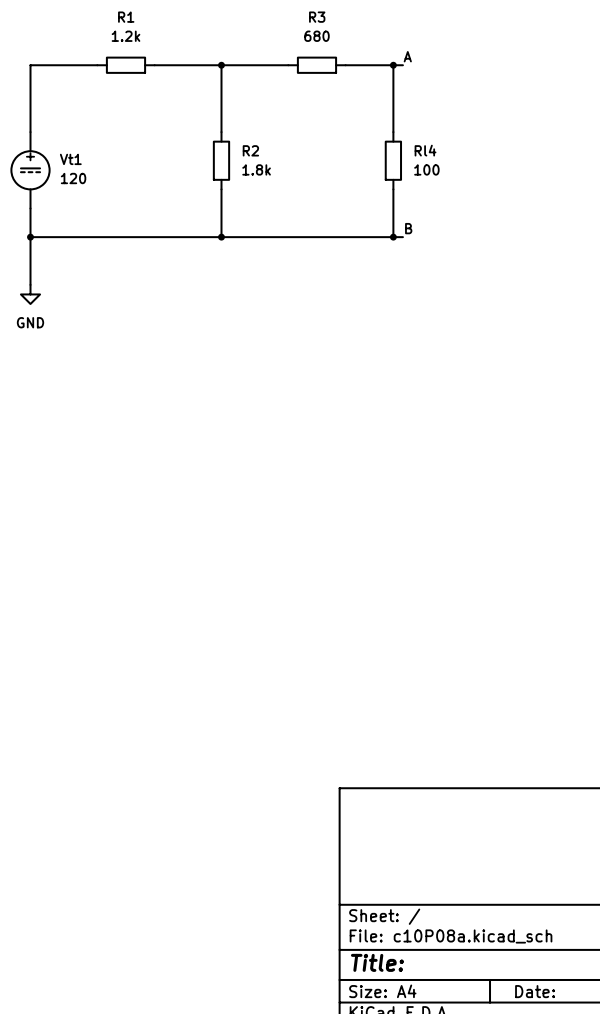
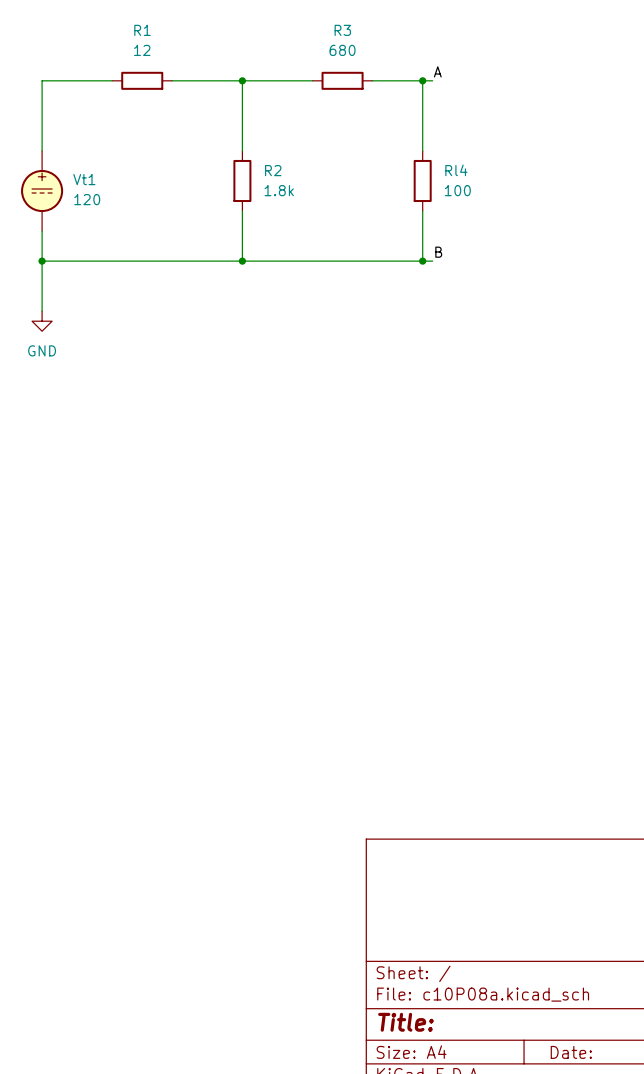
R1 value: 1.2k (126, 36) -> 12 (142, 50)

